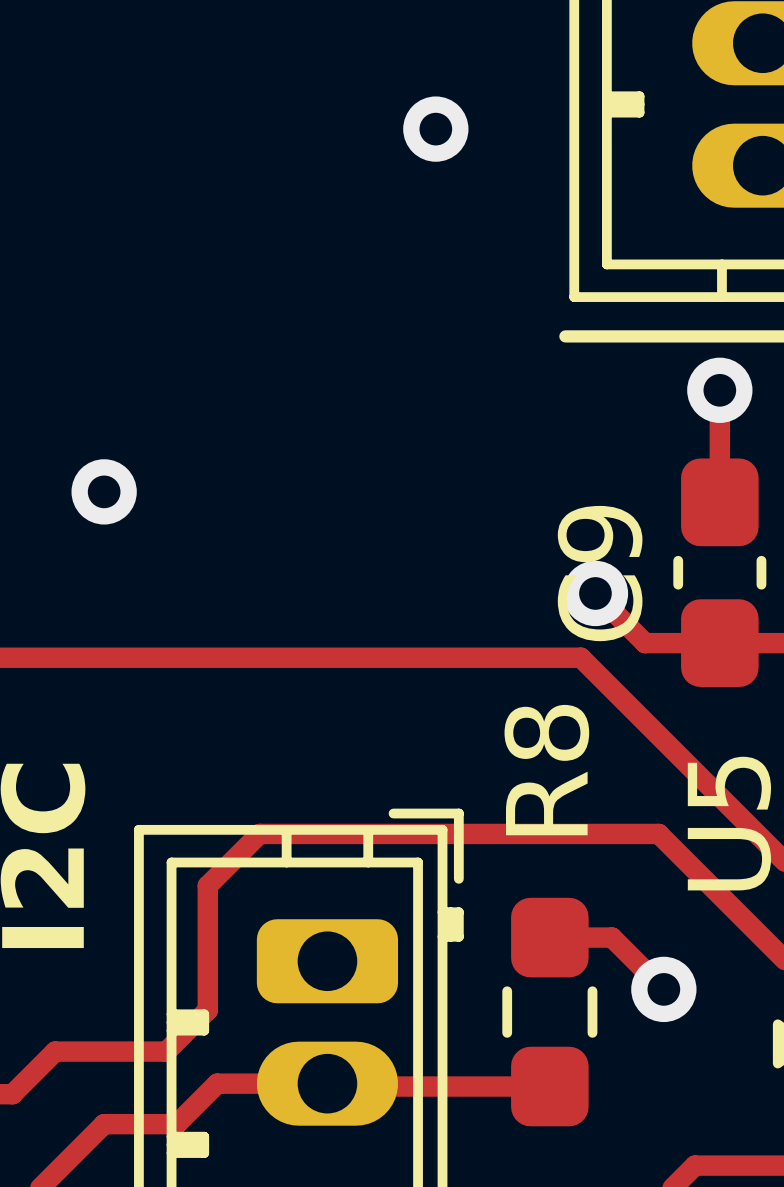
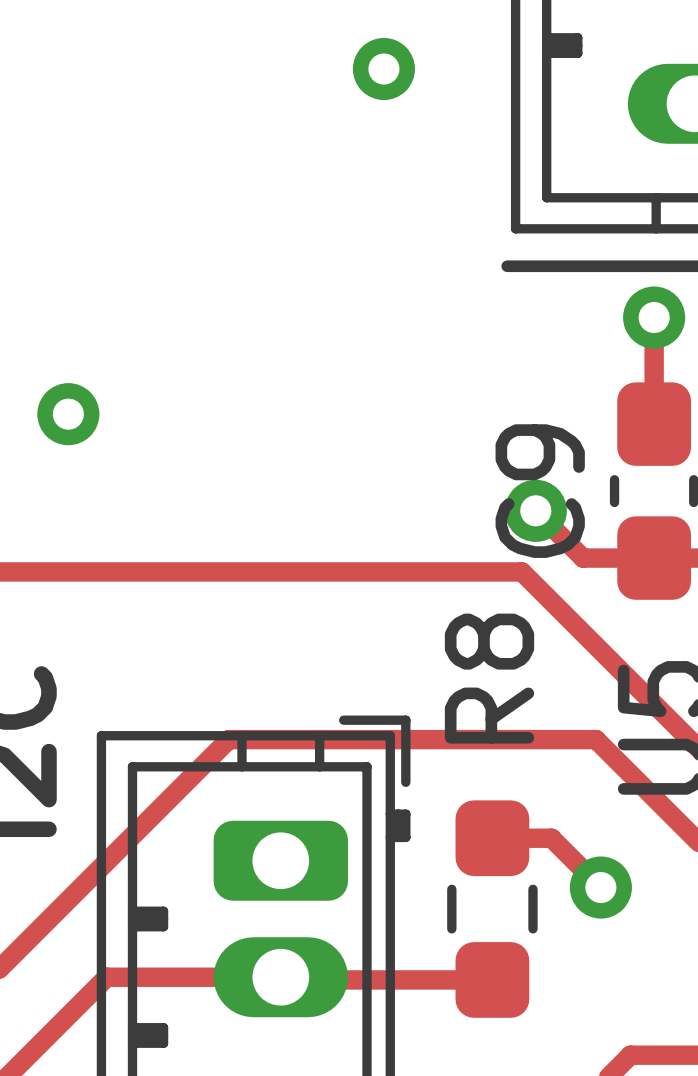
track: (272, 833) (259, 833) (207, 885) (207, 1010) (166, 1051) (55, 1051) -> (228, 739) (21, 946)
track: (217, 1083) (176, 1124) (104, 1124) -> (175, 977) (106, 977) (68, 1015)

